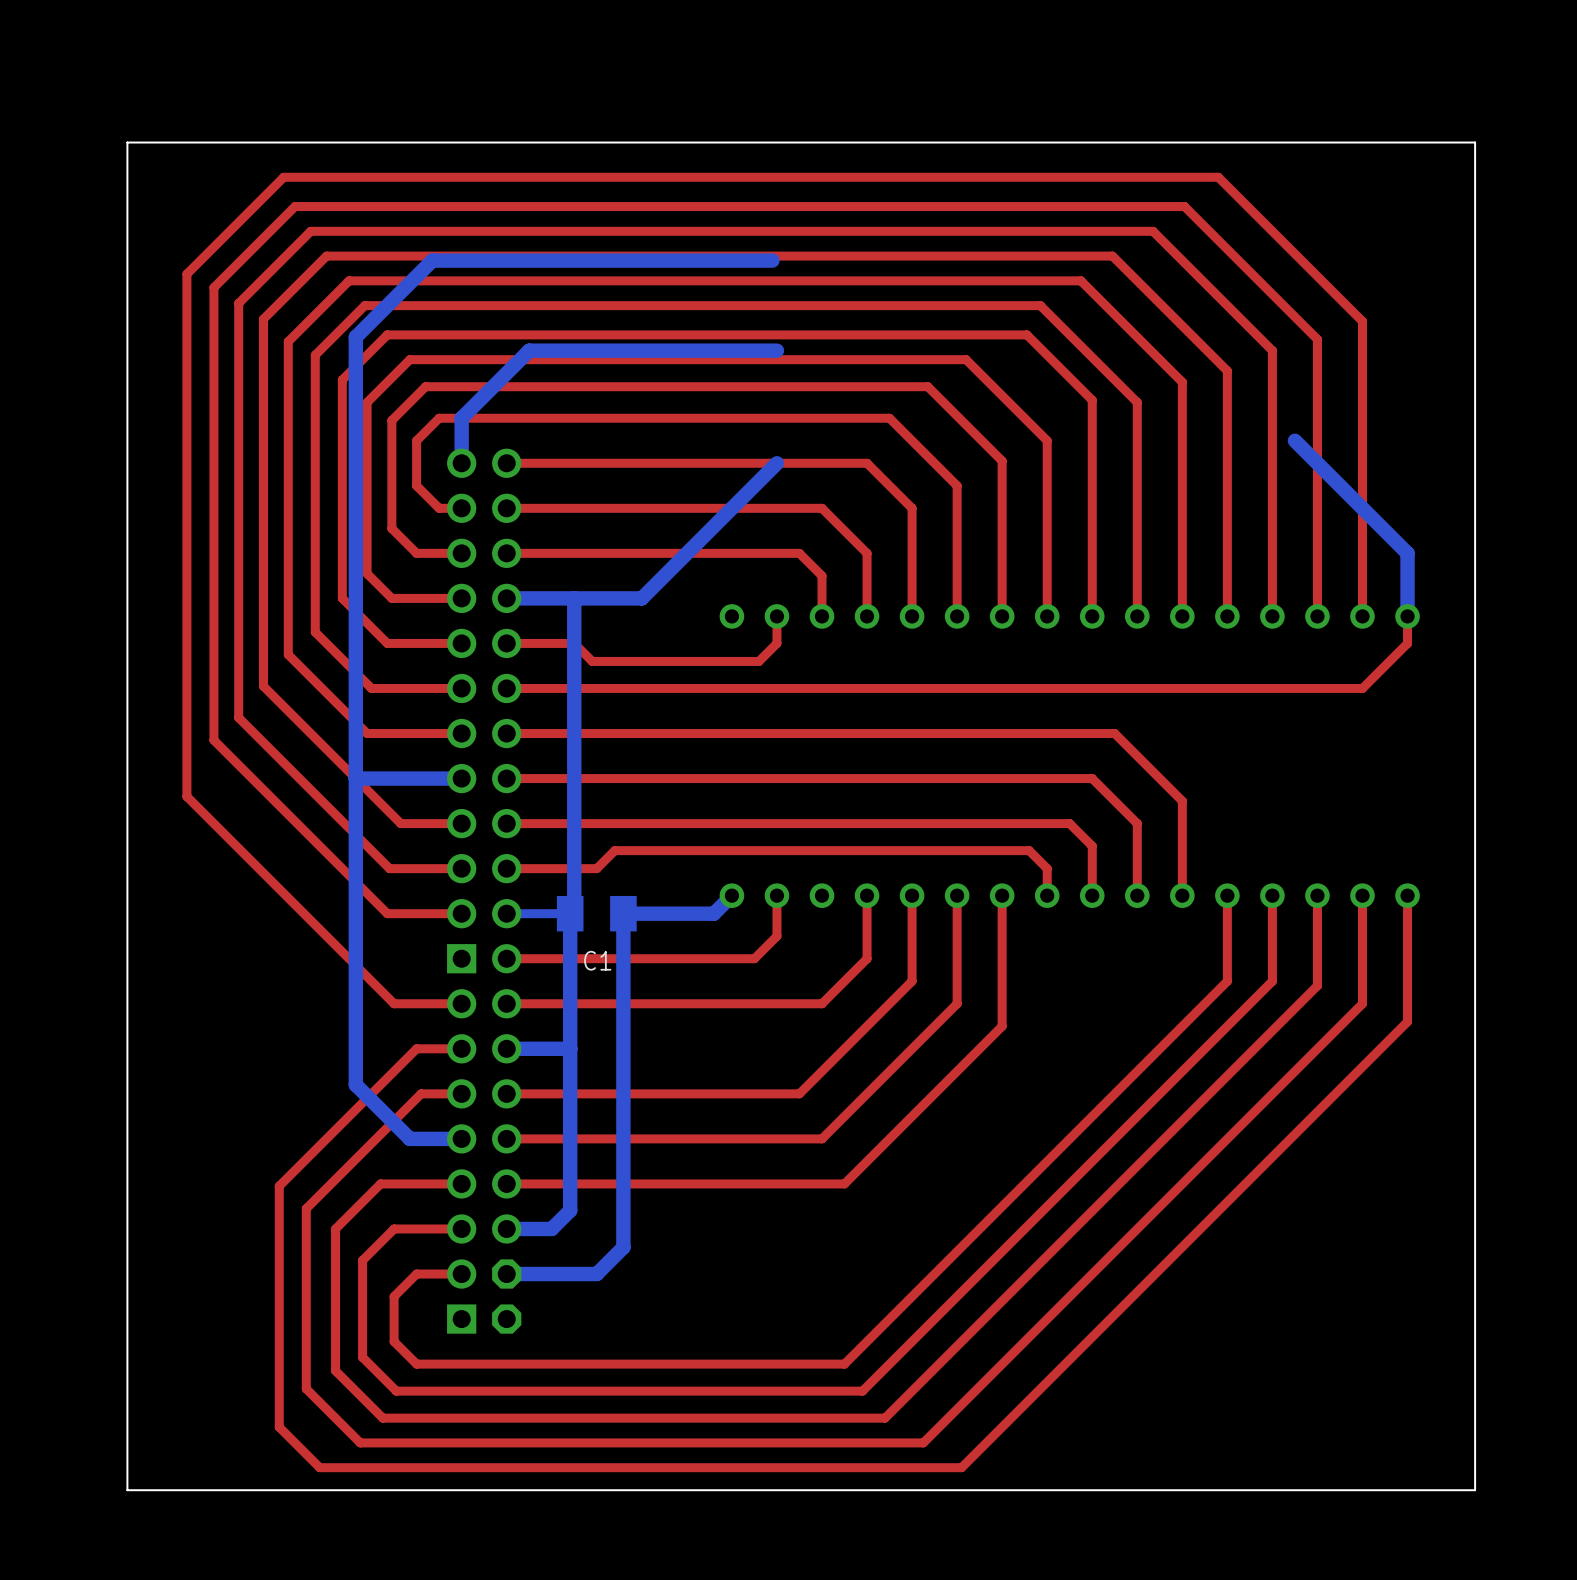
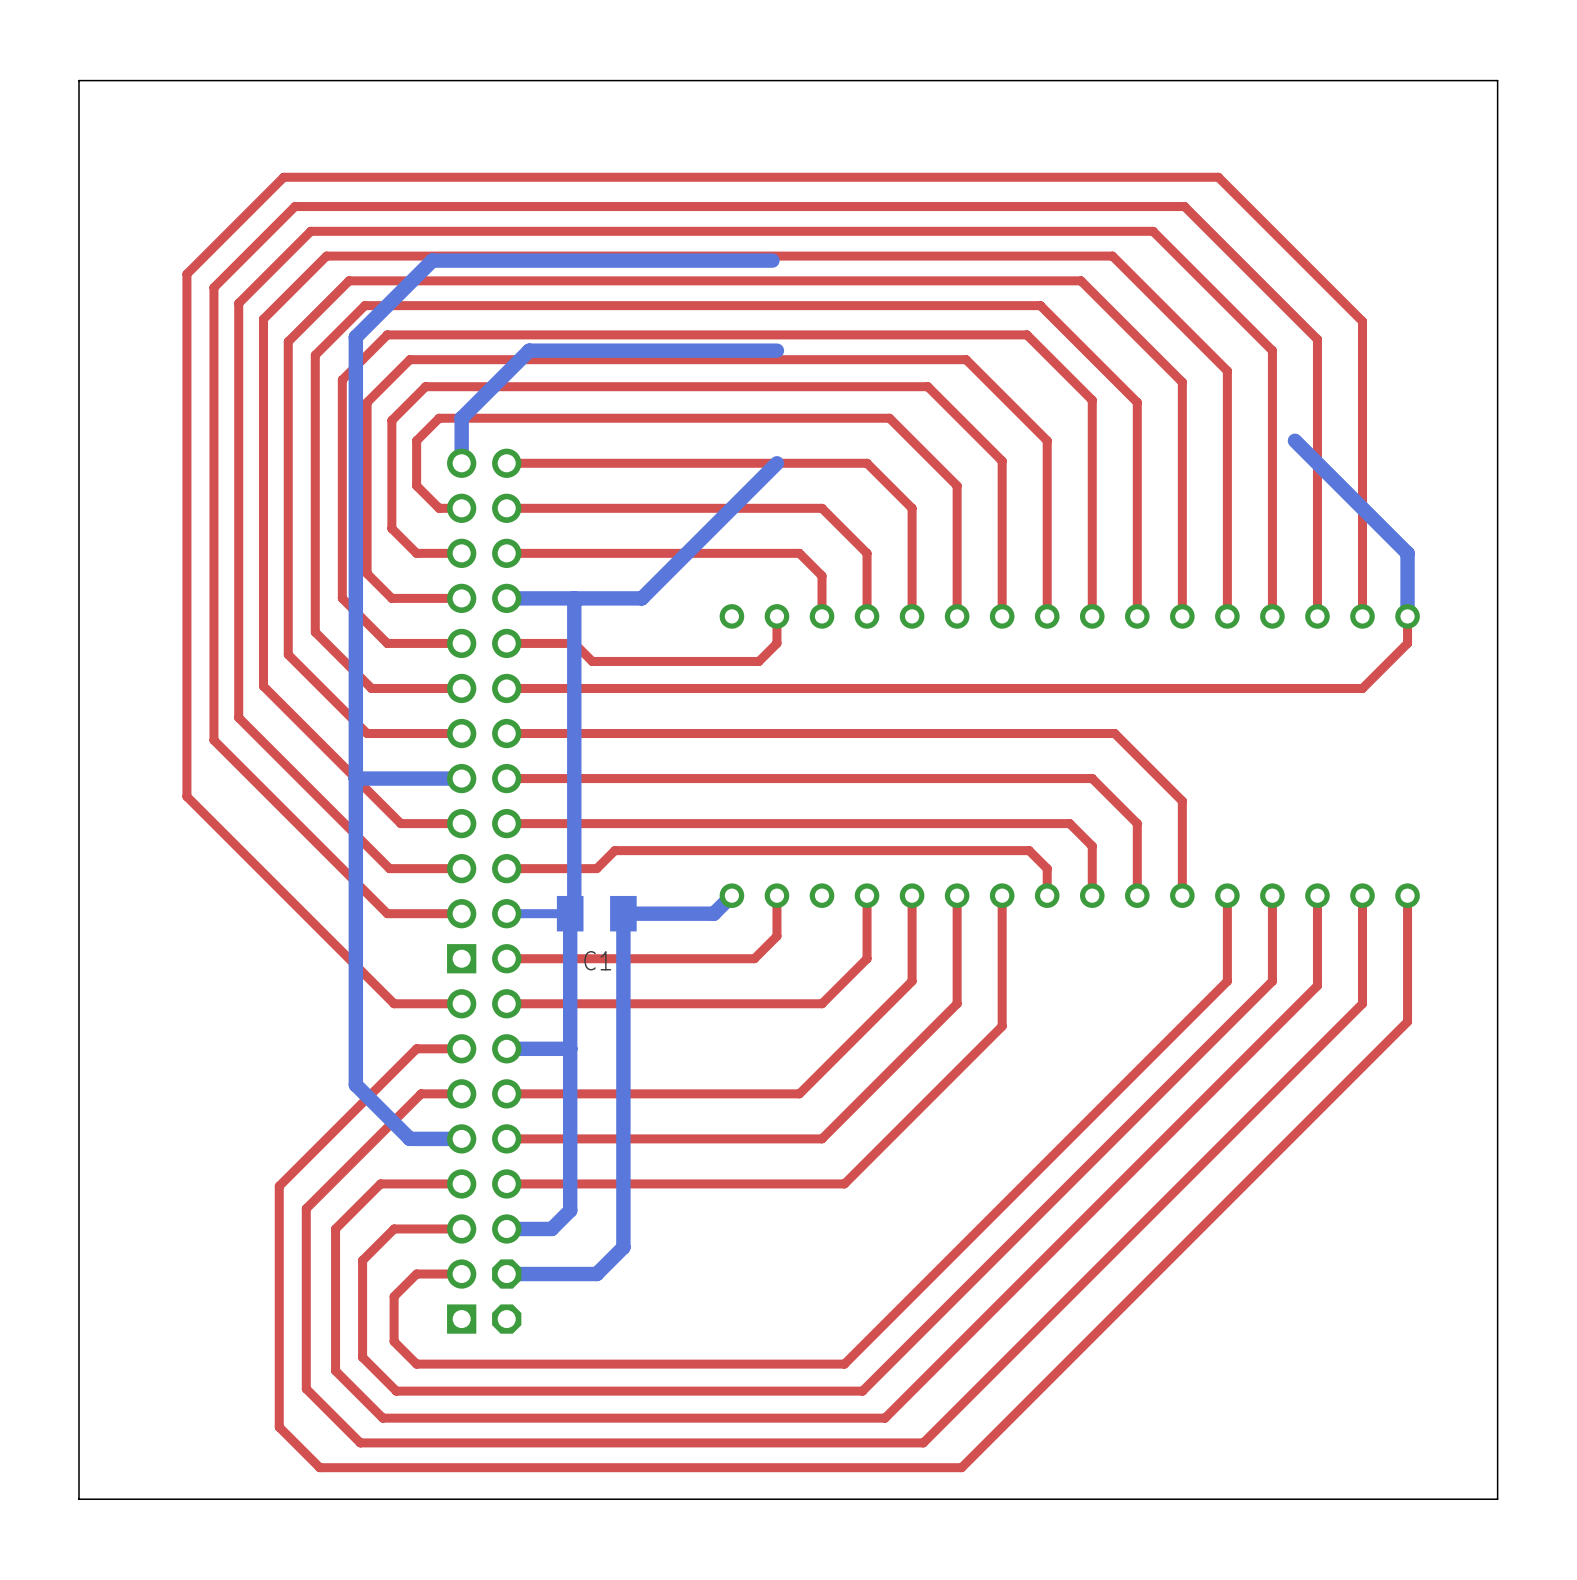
board edge: (1475, 142) (127, 142) (127, 1490) (1475, 1490) (1475, 142) -> (1497, 80) (1497, 1499) (79, 1499) (79, 80) (1497, 80)

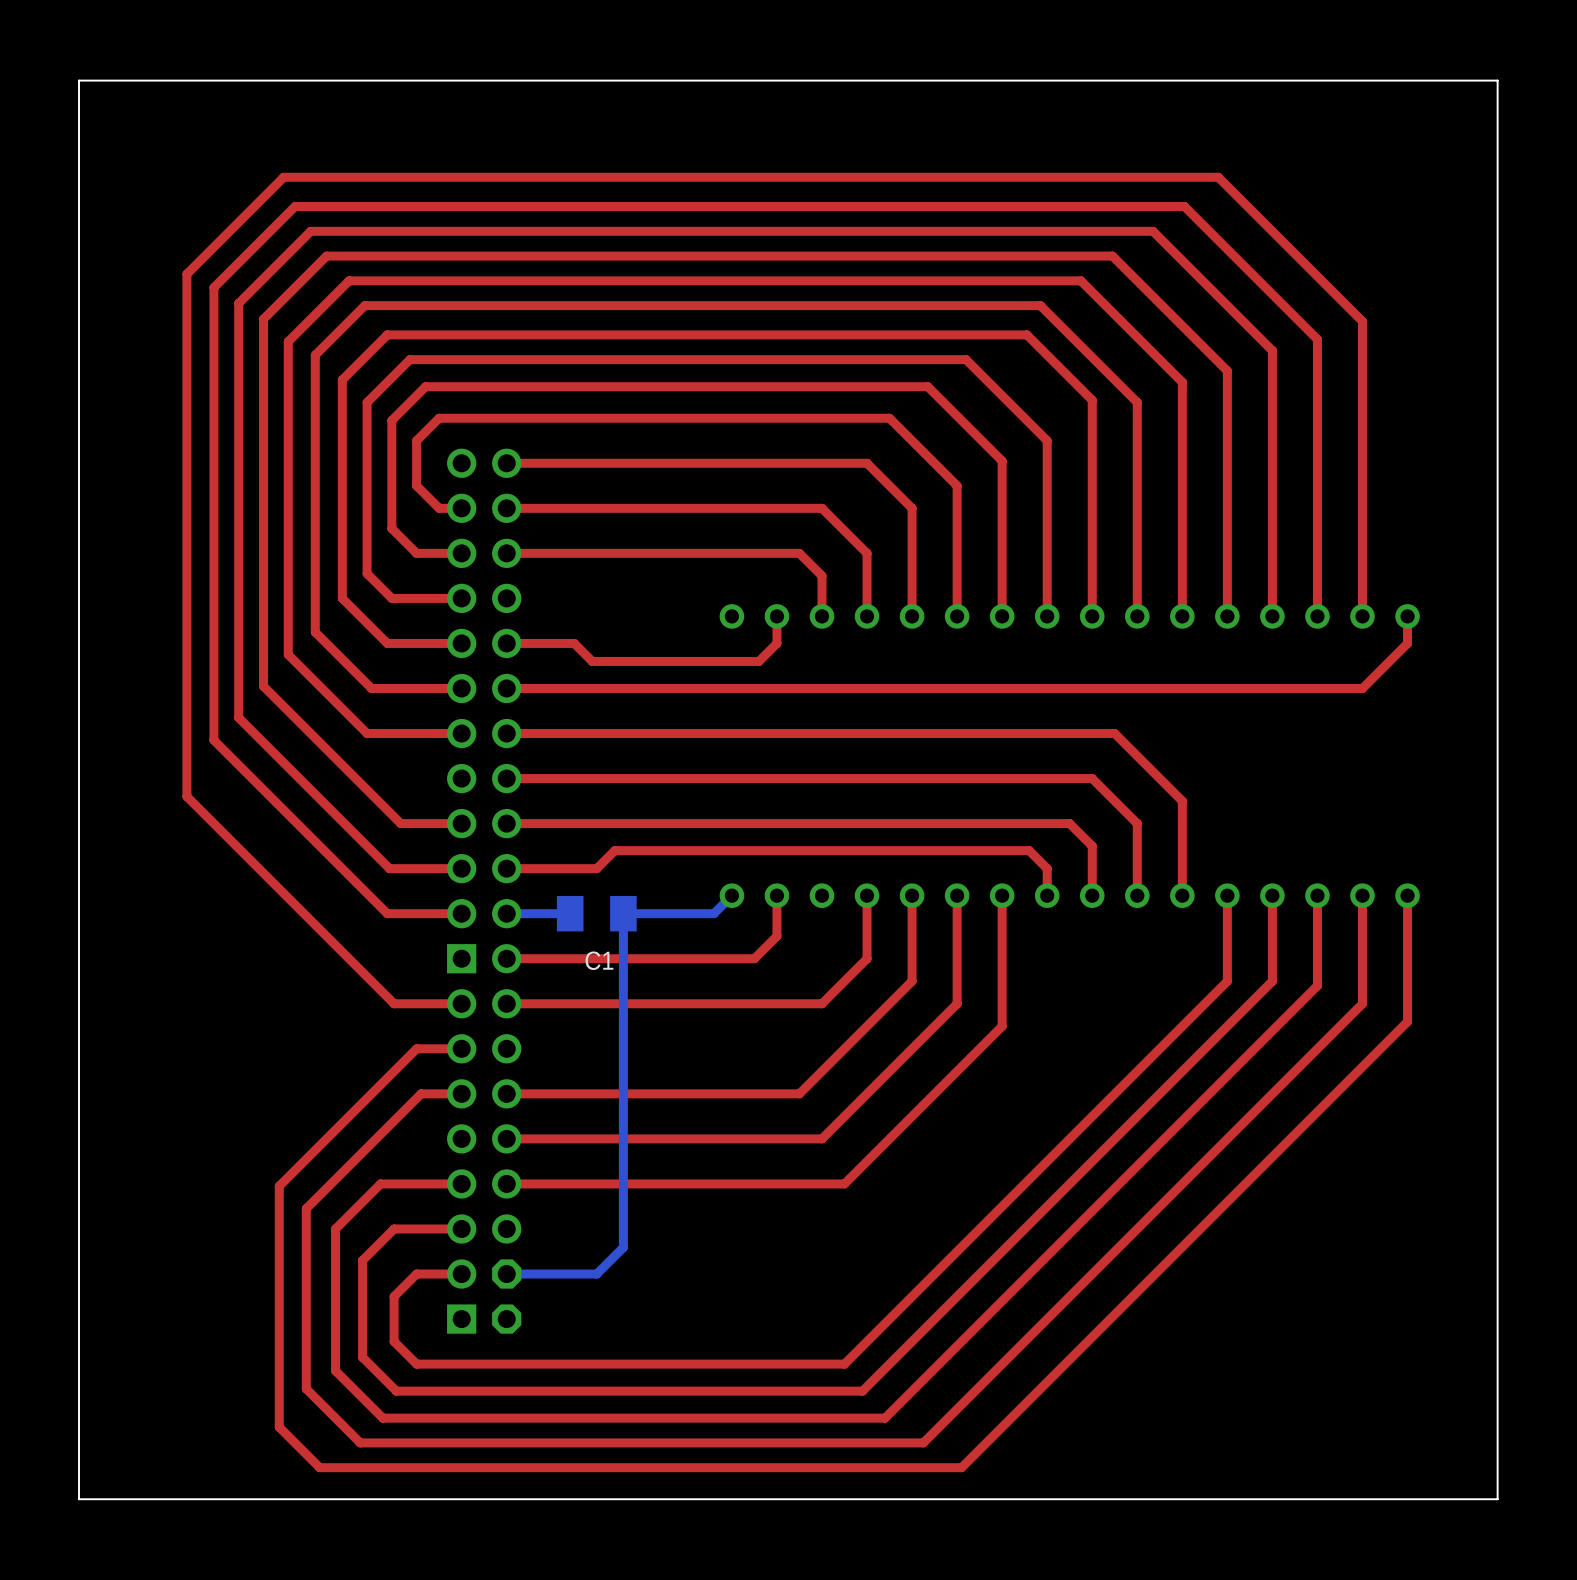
bottom track: (772, 260) (432, 260) (355, 337) (355, 1084) (409, 1138) (461, 1138) -> none
bottom track: (776, 350) (529, 350) (461, 418) (461, 463) -> none
bottom track: (1294, 440) (1407, 553) (1407, 616) -> none
bottom track: (776, 463) (641, 598) (506, 598) -> none
bottom track: (574, 598) (574, 909) (570, 913) (570, 1210) (551, 1228) (506, 1228) -> none
bottom track: (461, 778) (355, 778) -> none
bottom track width: thick (731, 895) (713, 913) (623, 913) (623, 1247) (596, 1274) (506, 1274) -> thin (731, 895) (713, 913) (623, 913) (623, 1247) (596, 1274) (506, 1274)
bottom track: (570, 1048) (506, 1048) -> none

